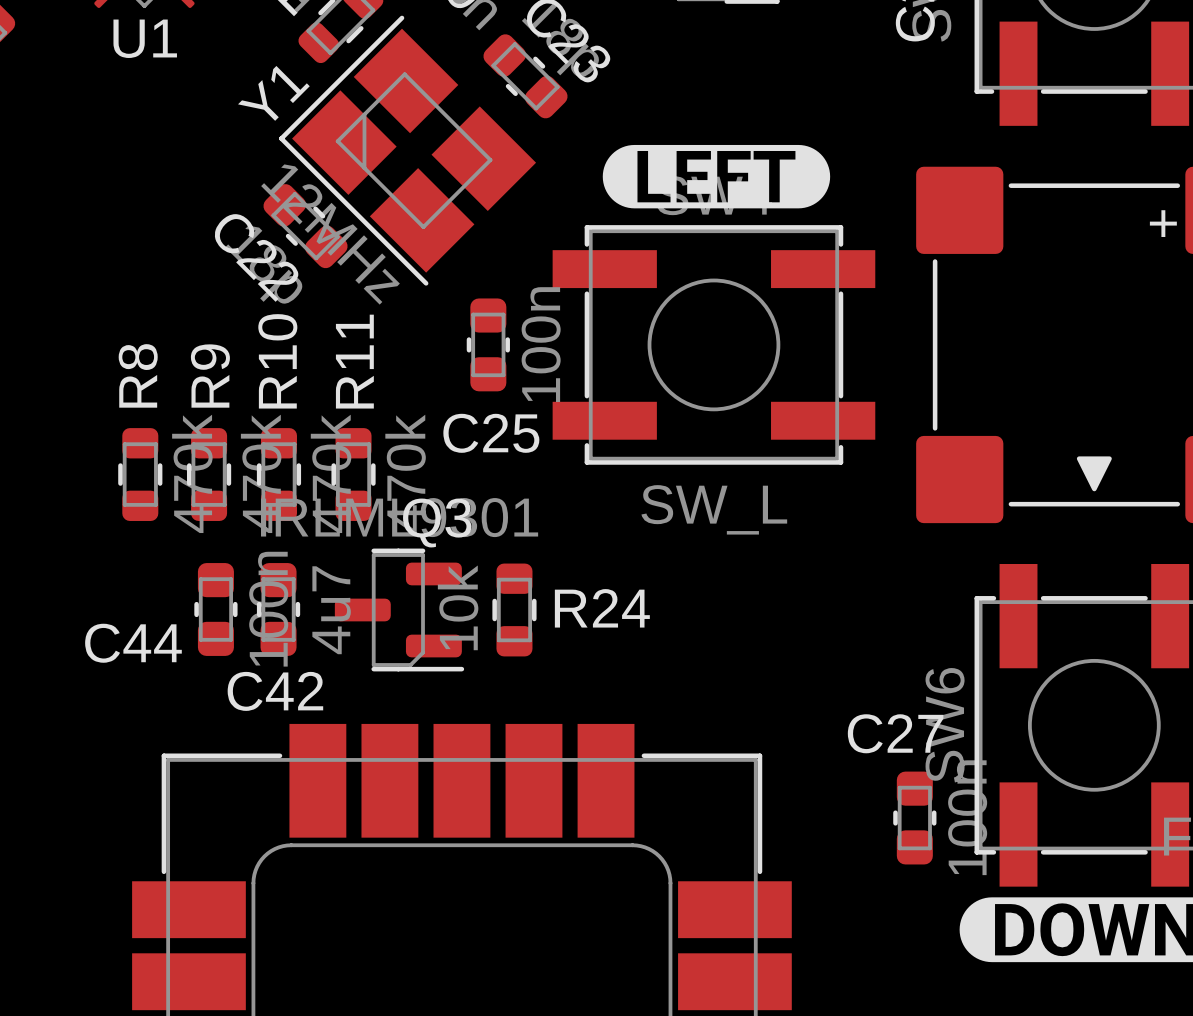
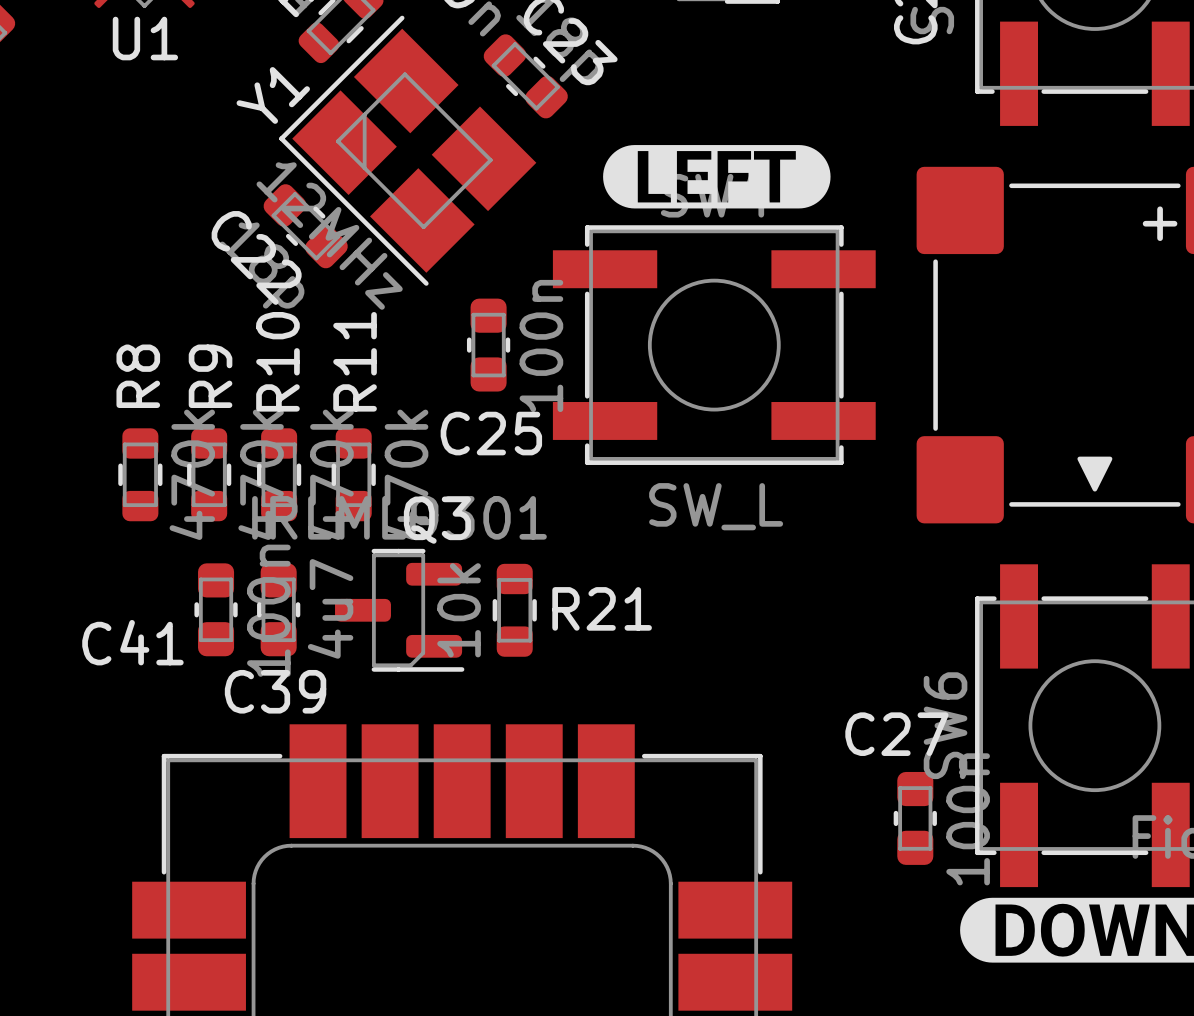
R24 name: R24 (602, 608) -> R21 (602, 608)
C44 name: C44 (133, 643) -> C41 (132, 642)
C42 name: C42 (275, 691) -> C39 (275, 691)

